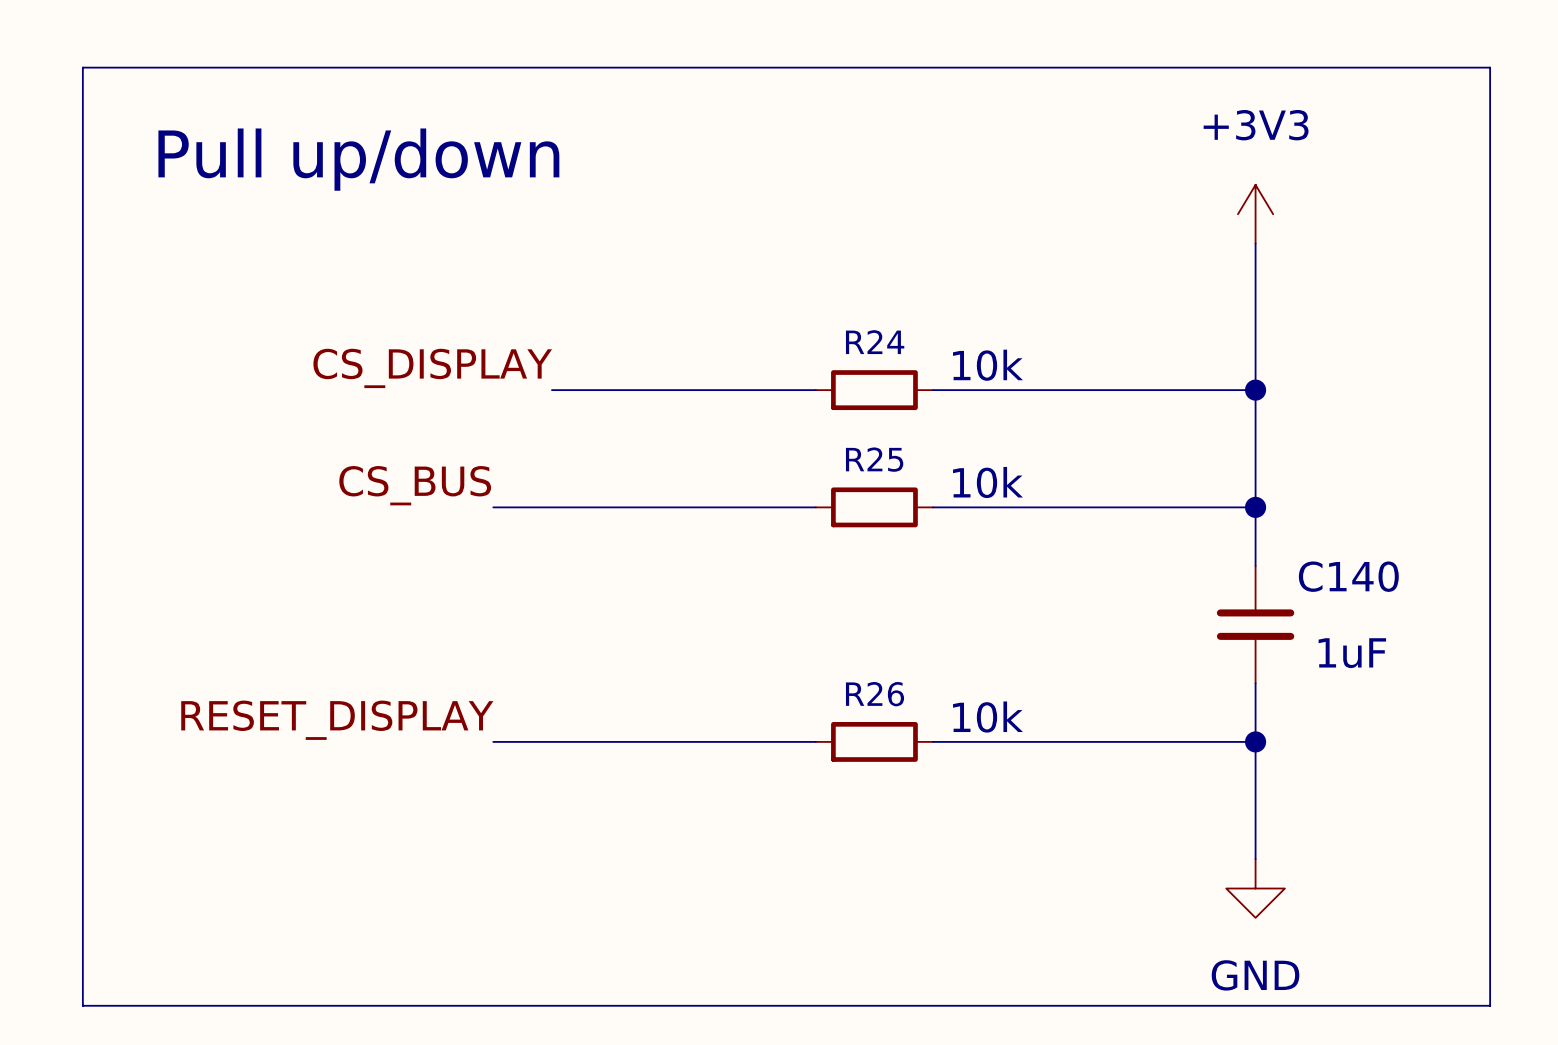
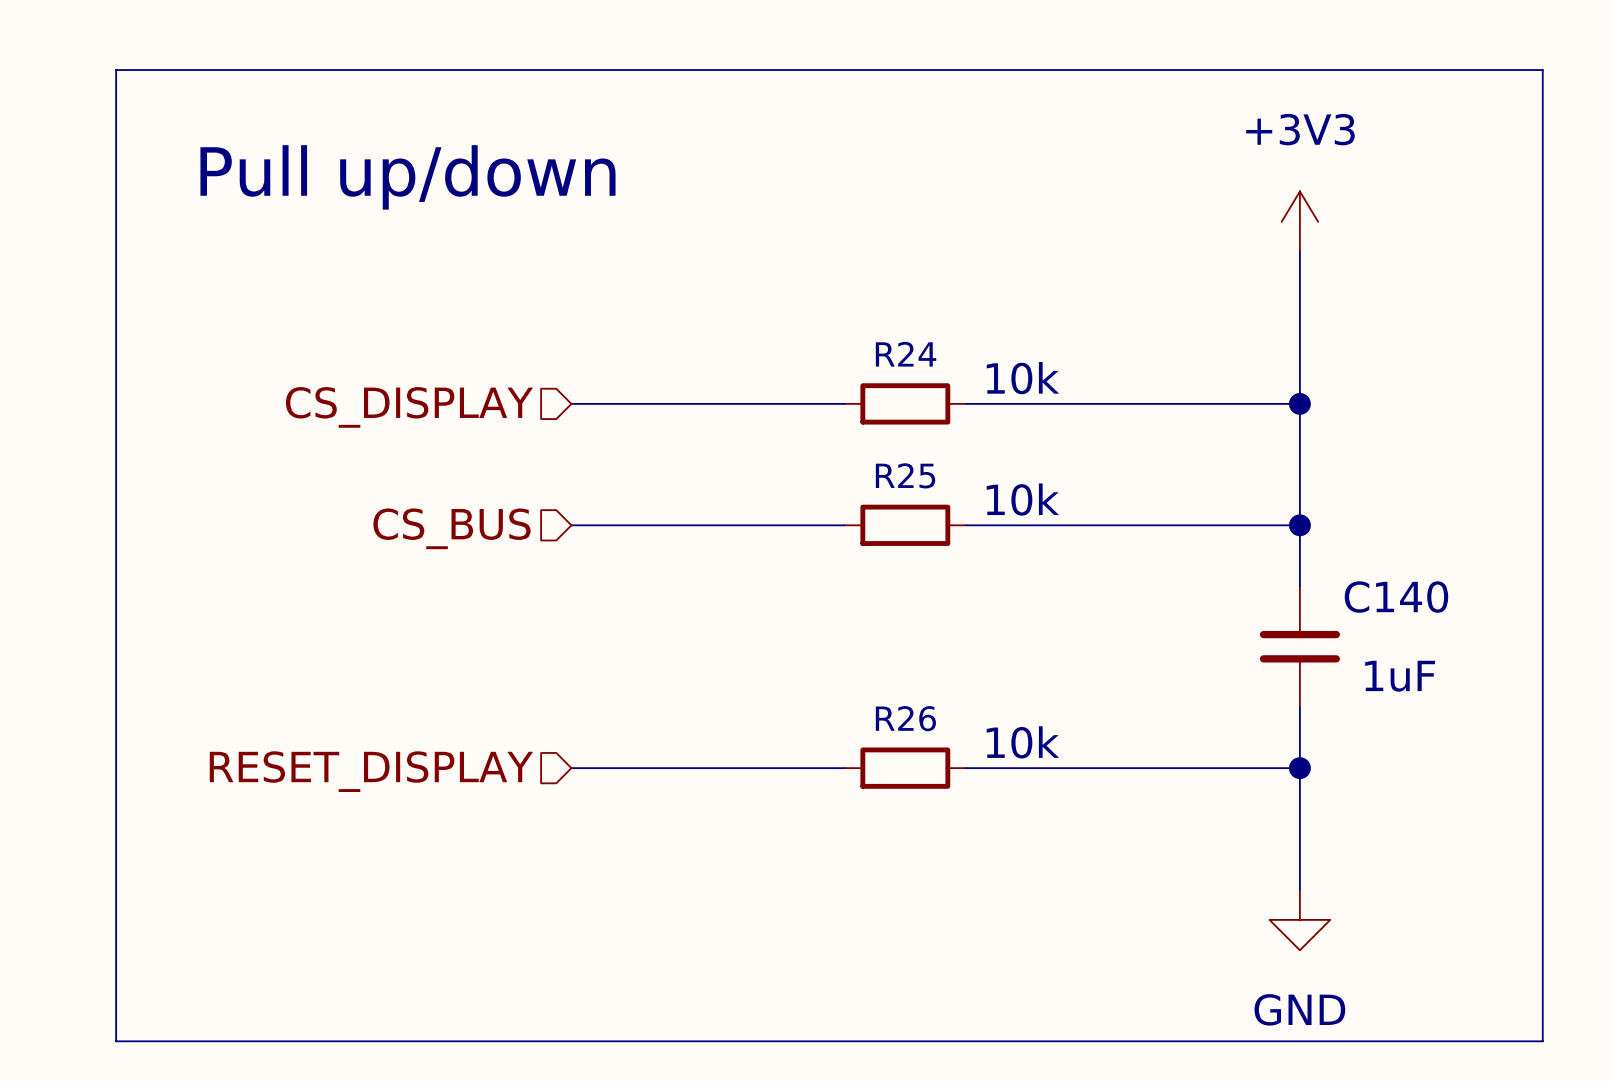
line: (112, 67) (82, 67) (82, 1005) (112, 1005) -> (116, 70) (116, 1041)
text position: Pull up/down (358, 159) -> Pull up/down (407, 177)
label: CS_DISPLAY (432, 368) -> none
hierarchical label: none -> CS_DISPLAY (409, 407)
label: CS_BUS (415, 485) -> none
wire: (493, 507) (551, 507) -> none
hierarchical label: none -> CS_BUS (452, 528)
label: RESET_DISPLAY (337, 720) -> none
wire: (493, 741) (551, 741) -> none
hierarchical label: none -> RESET_DISPLAY (371, 771)

